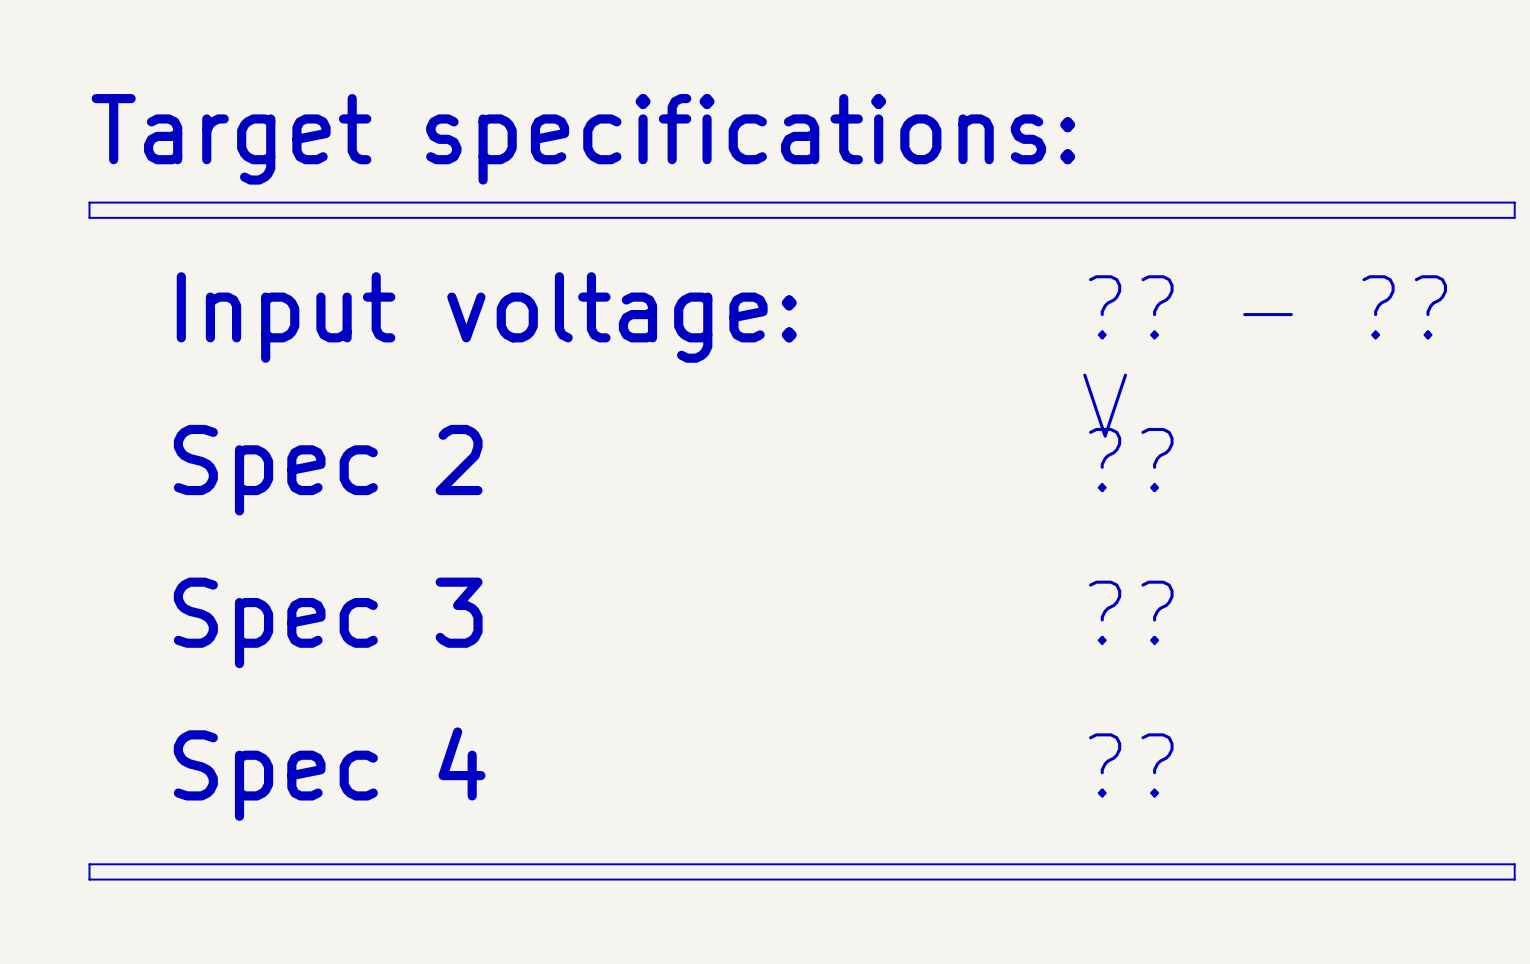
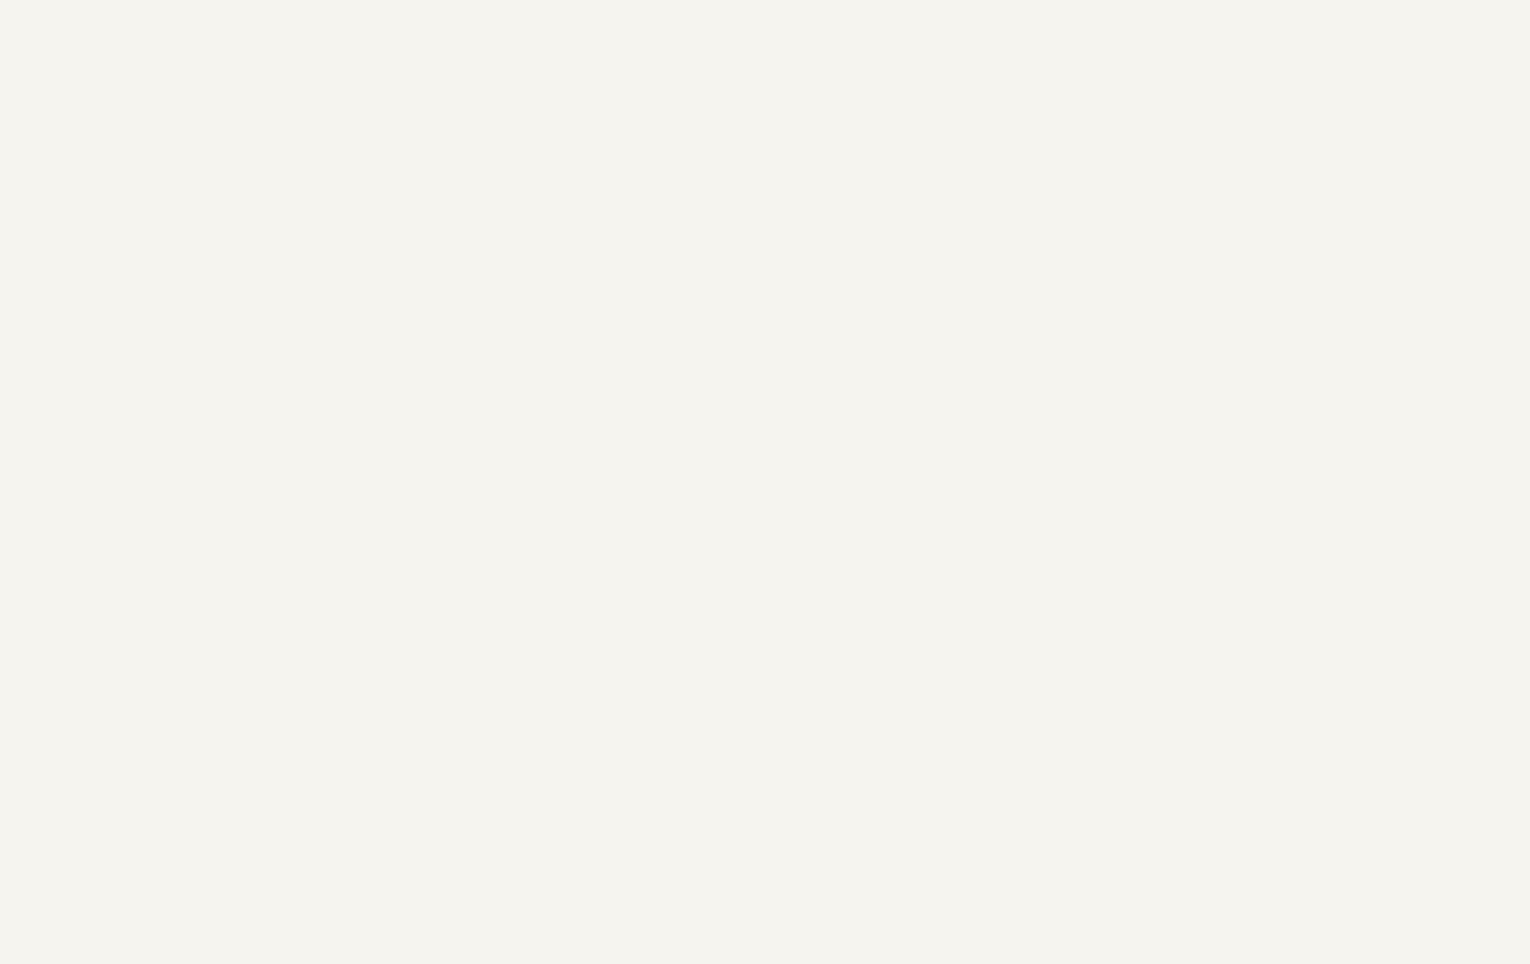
text: Target specifications: (583, 139) -> none
line: (89, 202) (89, 217) (1514, 217) (1514, 202) (89, 202) -> none
text: ?? - ?? (1268, 307) -> none
text: Input voltage: (486, 317) -> none
text: V (1105, 405) -> none
text: ?? (1131, 460) -> none
text: Spec 2 (328, 470) -> none
text: ?? (1131, 612) -> none
text: Spec 3 (328, 622) -> none
text: ?? (1131, 765) -> none
text: Spec 4 (329, 774) -> none
line: (89, 864) (1514, 864) (1514, 879) (89, 879) (89, 864) -> none

